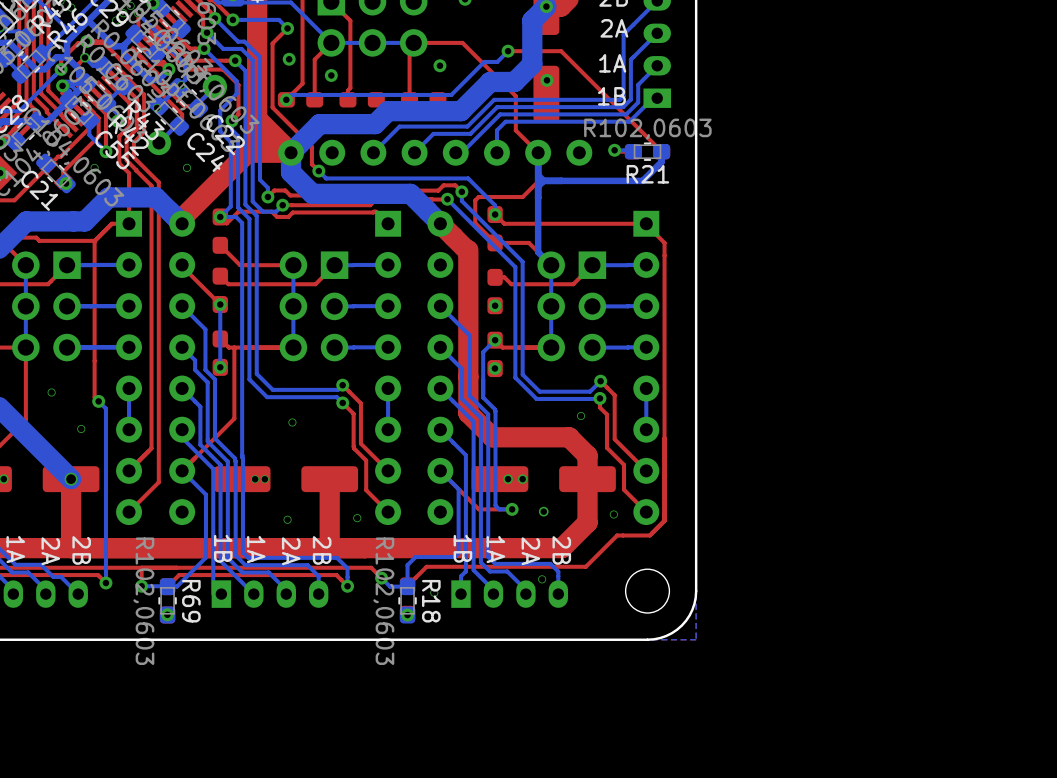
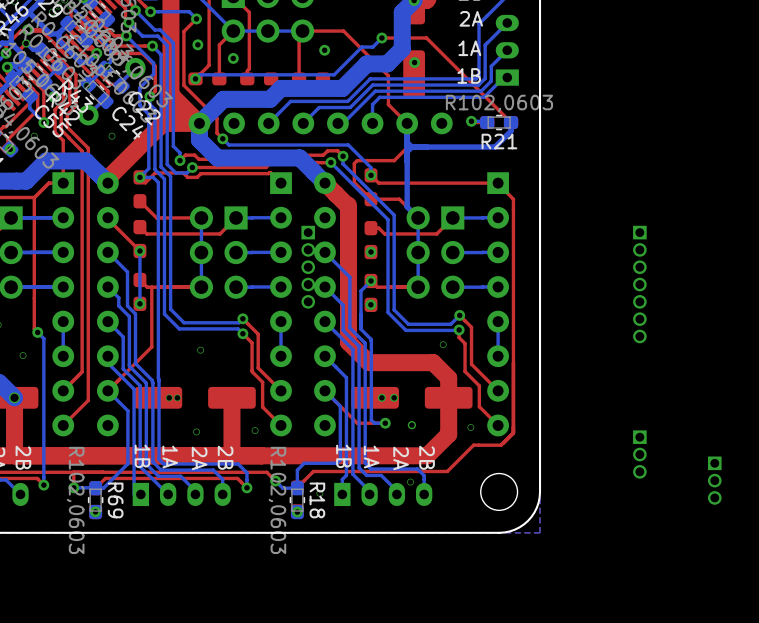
part: none -> (308, 267)
part: none -> (639, 284)
part: none -> (639, 454)
part: none -> (714, 480)

